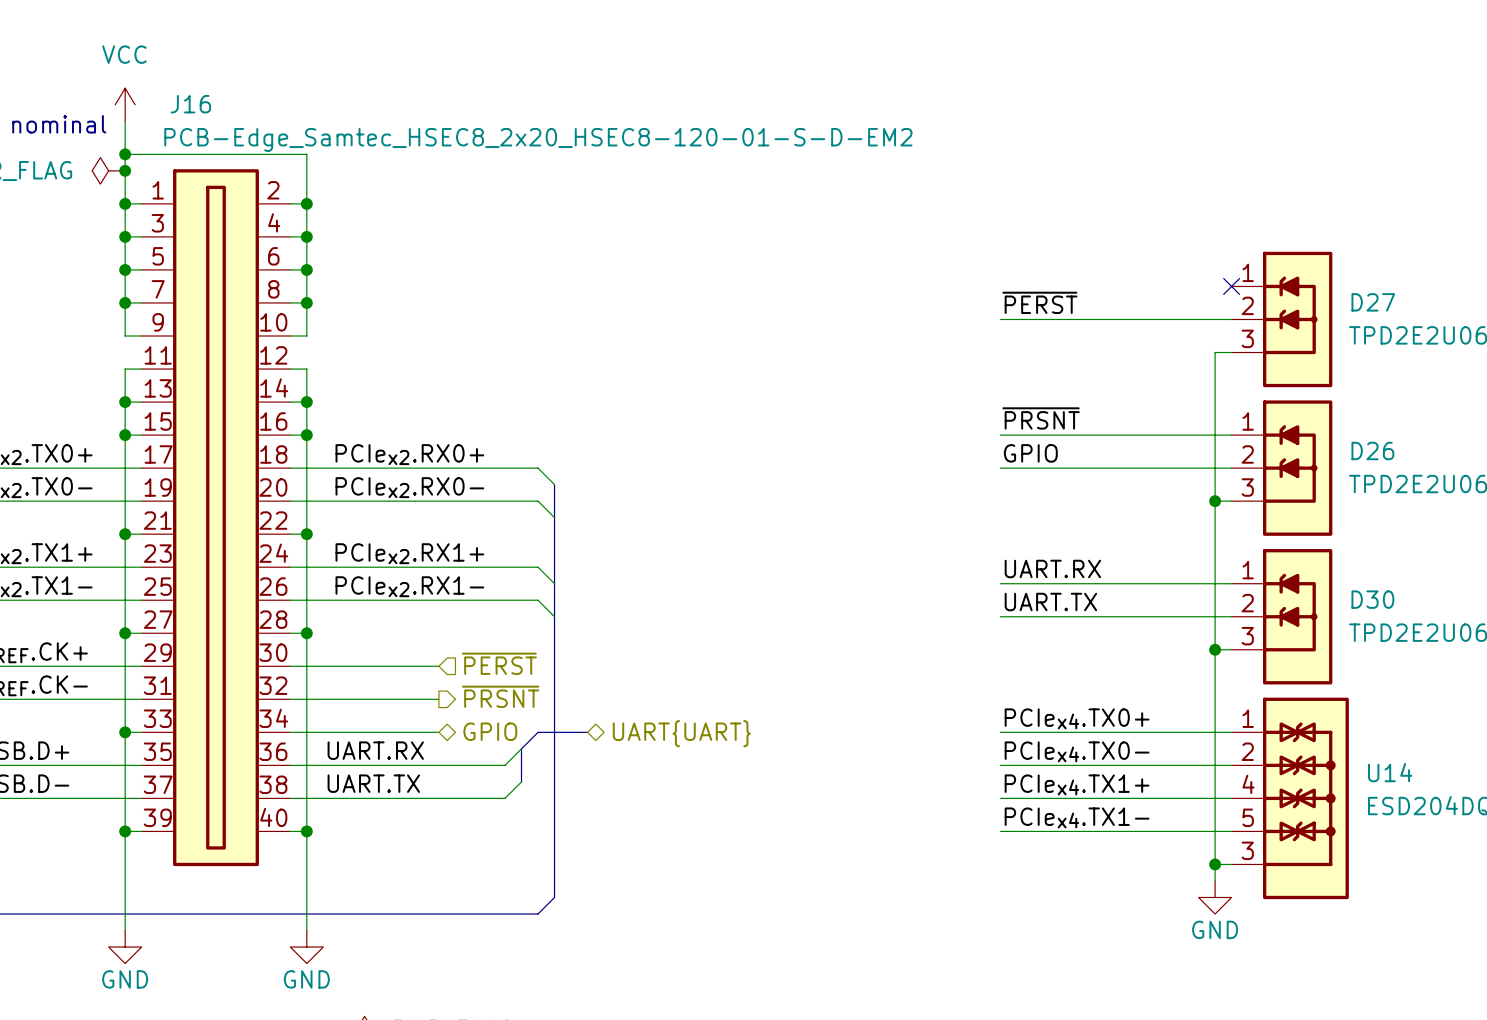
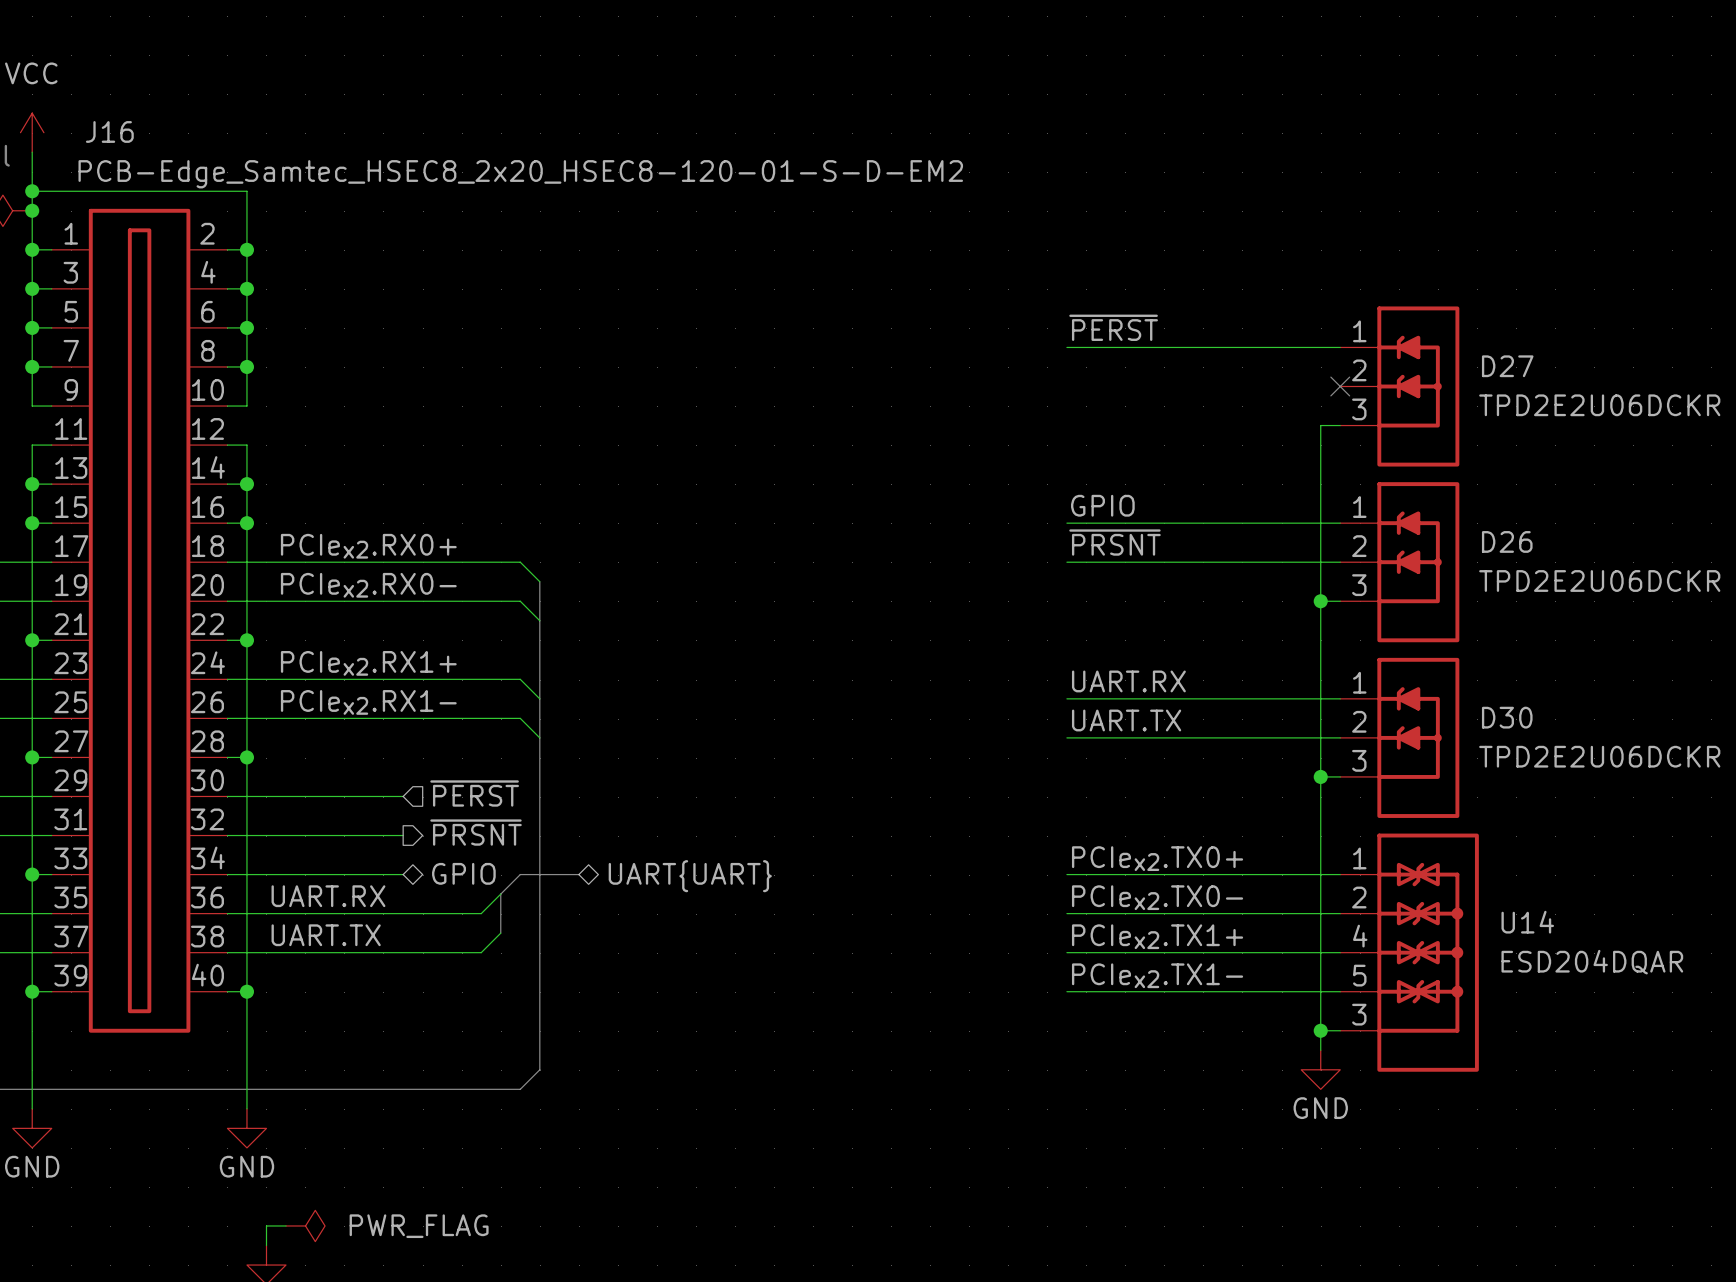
no-connect mark position: (1231, 286) -> (1340, 386)
label position: ~{PERST} (1039, 302) -> ~{PERST} (1113, 327)
wire: (1000, 319) (1231, 319) -> (1066, 347) (1340, 347)
label: ~{PRSNT} (1041, 418) -> GPIO (1102, 505)
label: GPIO (1030, 453) -> ~{PRSNT} (1115, 542)
label: PCIex4.TX0+ (1077, 718) -> PCIex2.TX0+ (1157, 858)
label: PCIex4.TX0- (1077, 751) -> PCIex2.TX0- (1157, 897)
label: PCIex4.TX1+ (1077, 784) -> PCIex2.TX1+ (1157, 936)
label: PCIex4.TX1- (1077, 817) -> PCIex2.TX1- (1157, 975)

